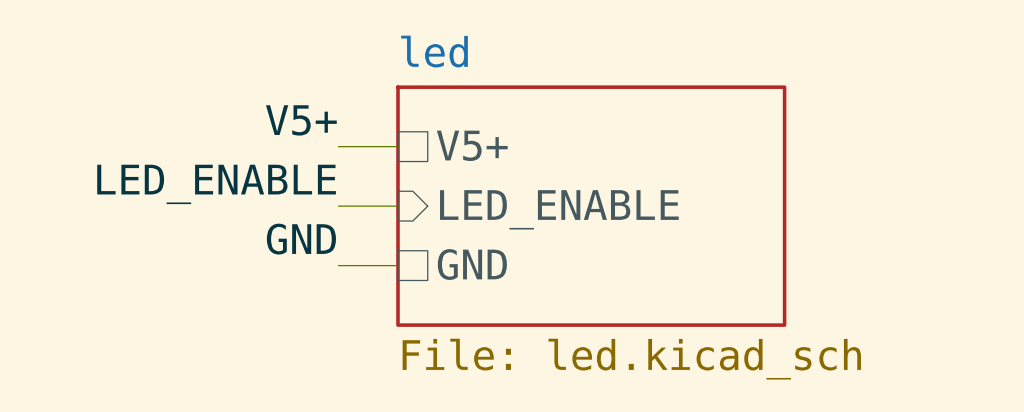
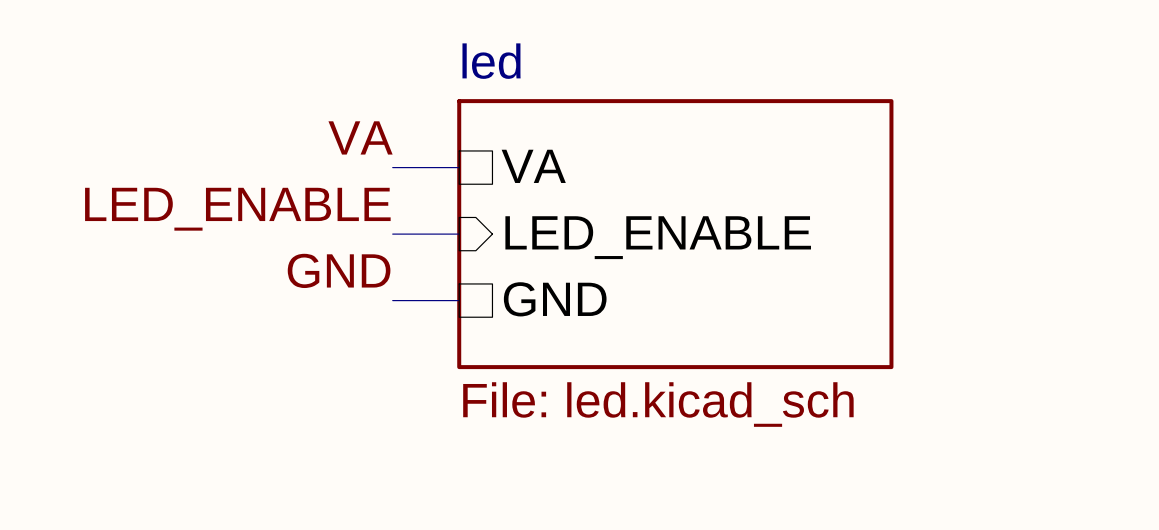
label: V5+ (301, 120) -> VA (360, 137)
sheet pin: V5+ (472, 145) -> VA (533, 166)

